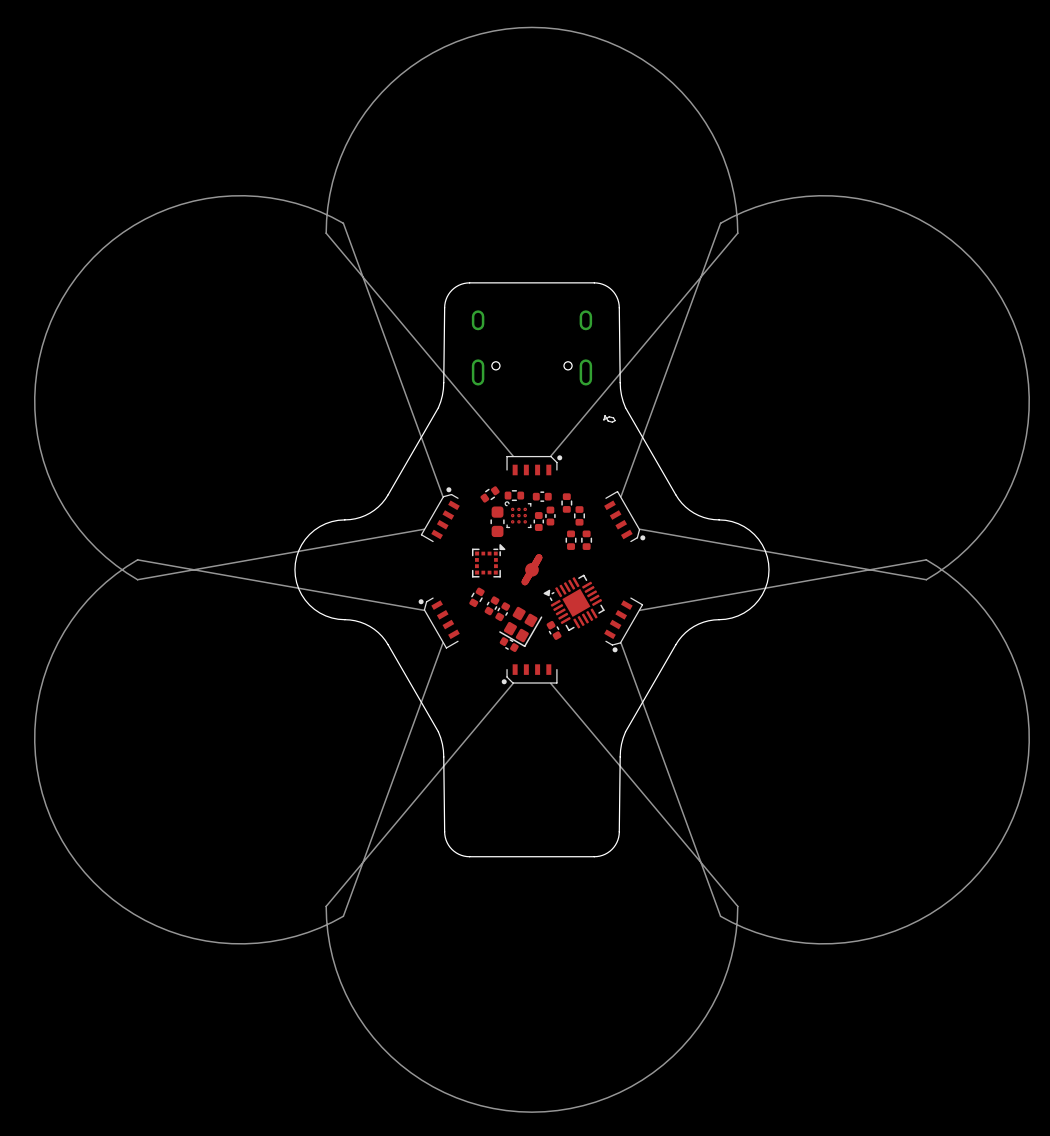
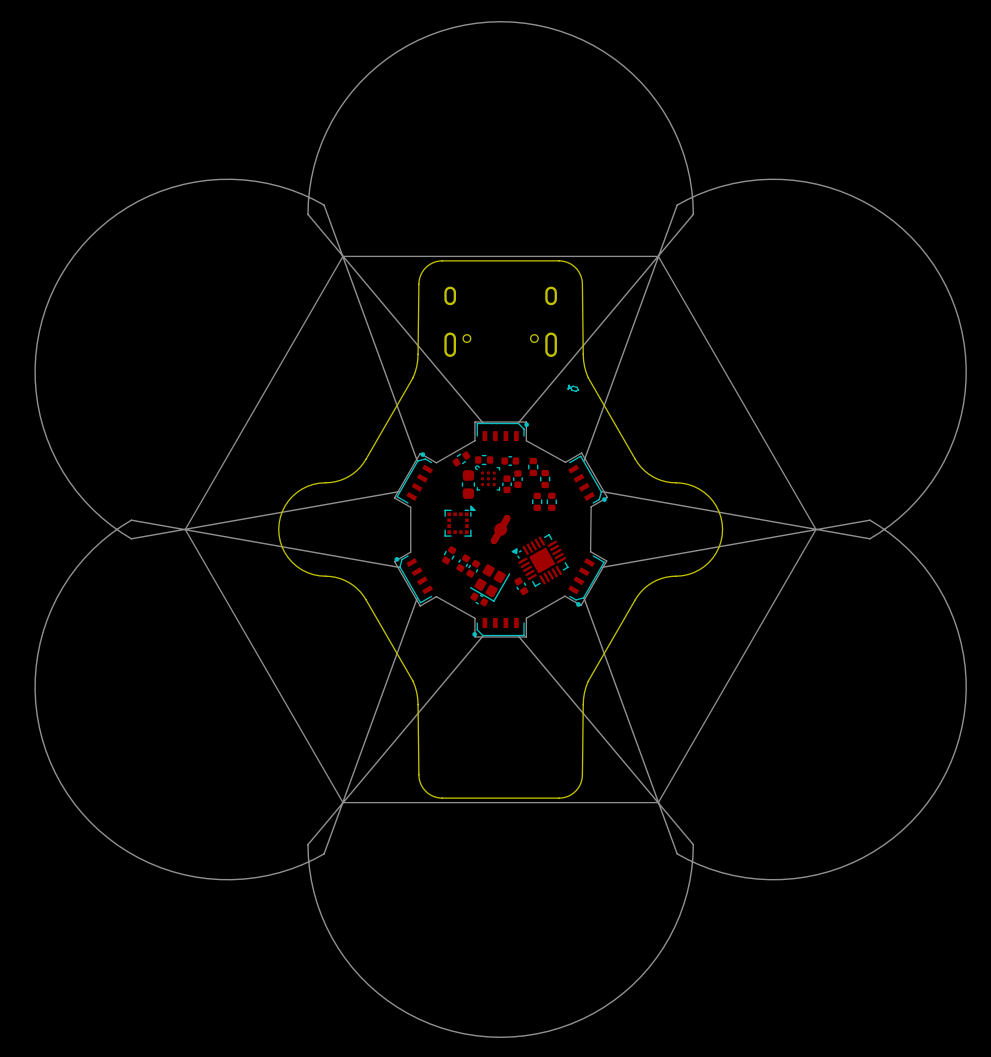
line: none -> (342, 256) (185, 529) (342, 802) (658, 802) (816, 529) (658, 256) (342, 256)
line: none -> (474, 422) (474, 440) (436, 462) (420, 453) (394, 497) (410, 507) (410, 552) (394, 561) (420, 606) (436, 596) (474, 618) (474, 636) (526, 636) (526, 618) (564, 596) (581, 605) (606, 561) (590, 551) (591, 506) (607, 497) (581, 453) (565, 462) (526, 440) (526, 422) (474, 422)

